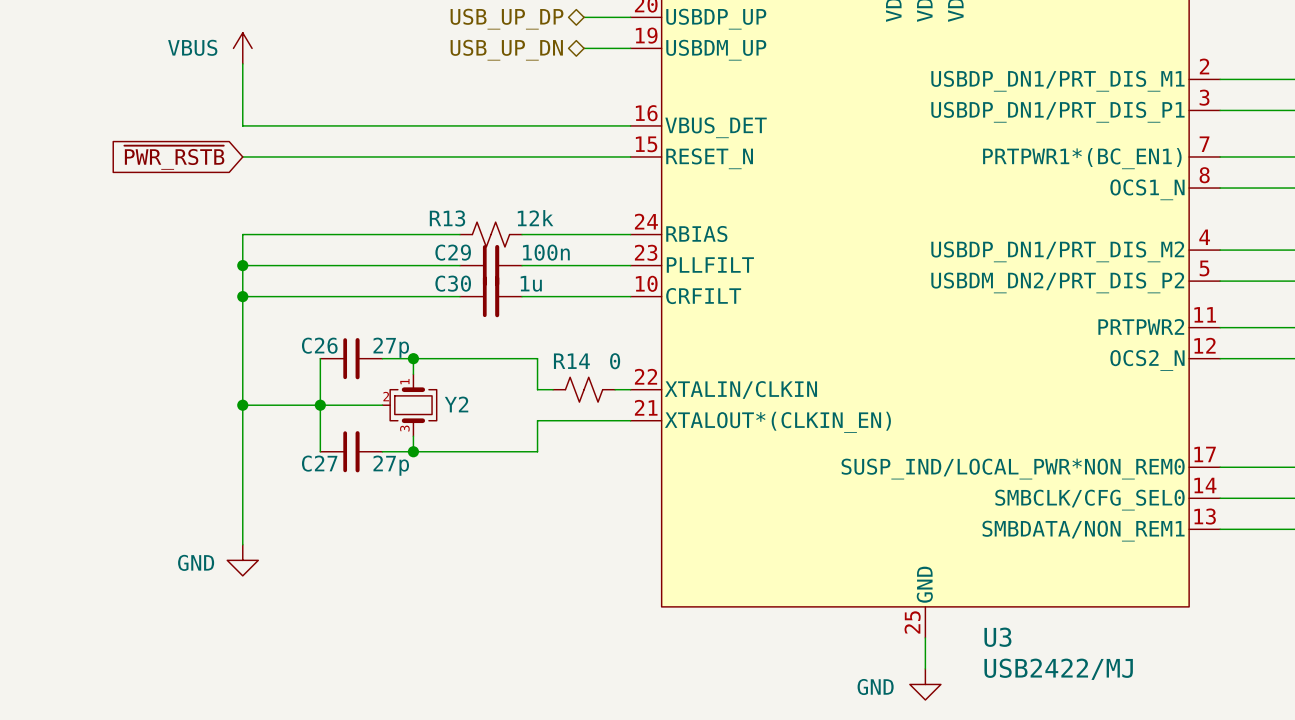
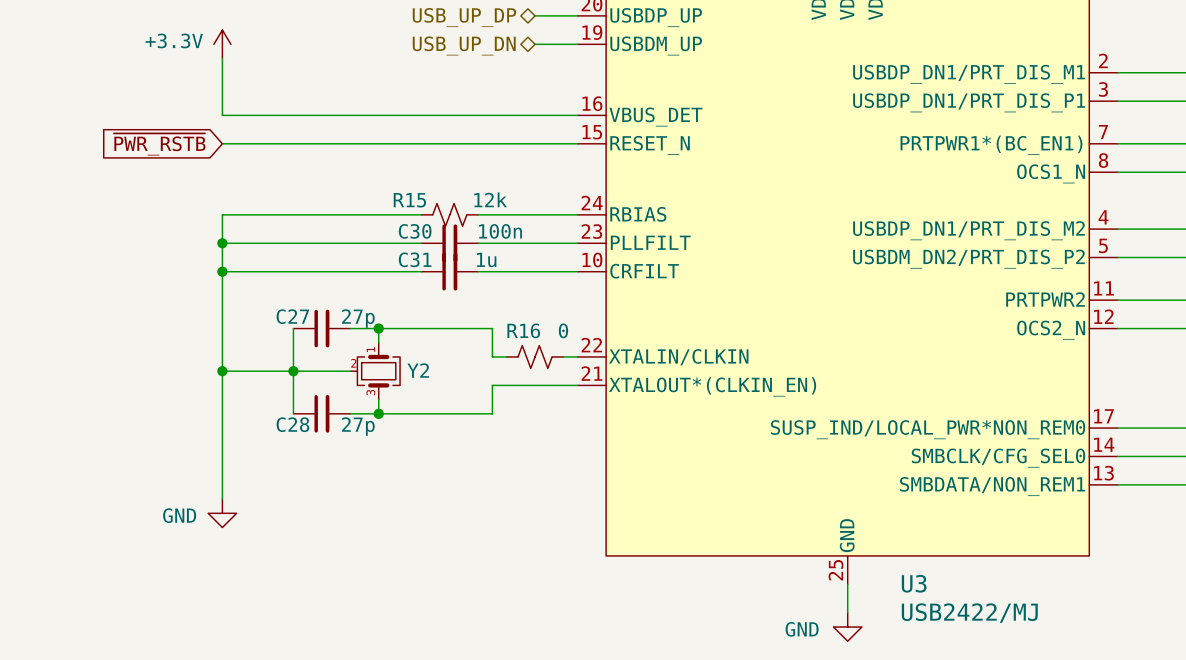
power symbol: VBUS (242, 48) -> +3.3V (222, 44)
R13 name: R13 (447, 218) -> R15 (409, 200)
C29 name: C29 (453, 252) -> C30 (415, 231)
C30 name: C30 (453, 283) -> C31 (415, 259)
C26 name: C26 (319, 345) -> C27 (292, 316)
R14 name: R14 (571, 361) -> R16 (523, 330)
C27 name: C27 (319, 463) -> C28 (292, 424)

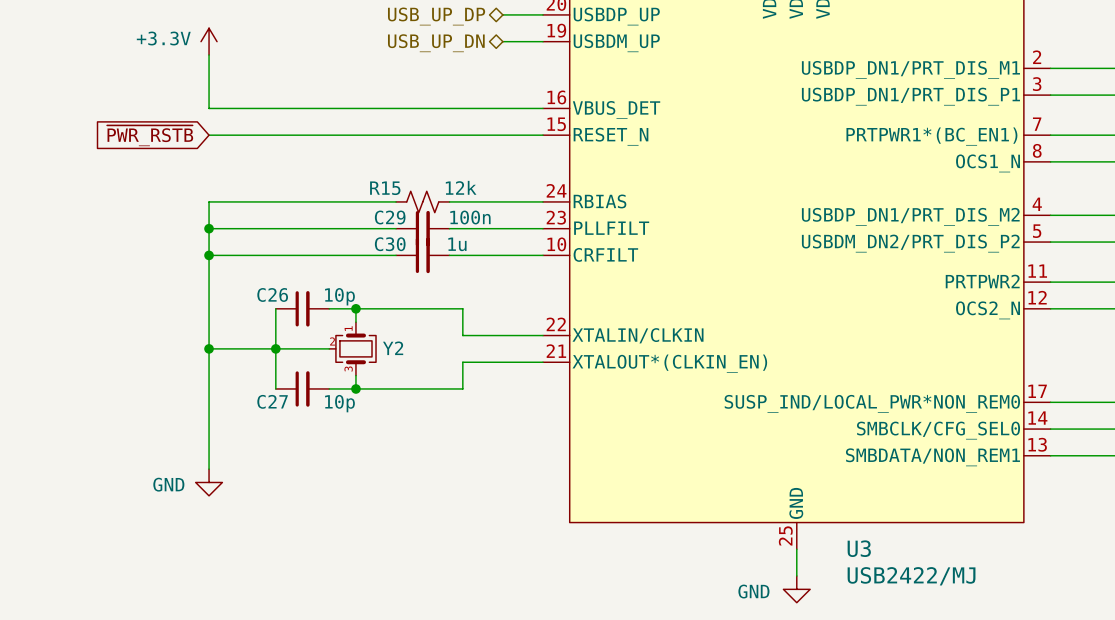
C30 name: C30 (415, 231) -> C29 (390, 217)
C31 name: C31 (415, 259) -> C30 (390, 244)
C27 name: C27 (292, 316) -> C26 (272, 294)
C27 value: 27p (358, 318) -> 10p (339, 296)
R16: 0 (535, 356) -> none
C28 name: C28 (292, 424) -> C27 (272, 401)
C28 value: 27p (358, 426) -> 10p (339, 403)

